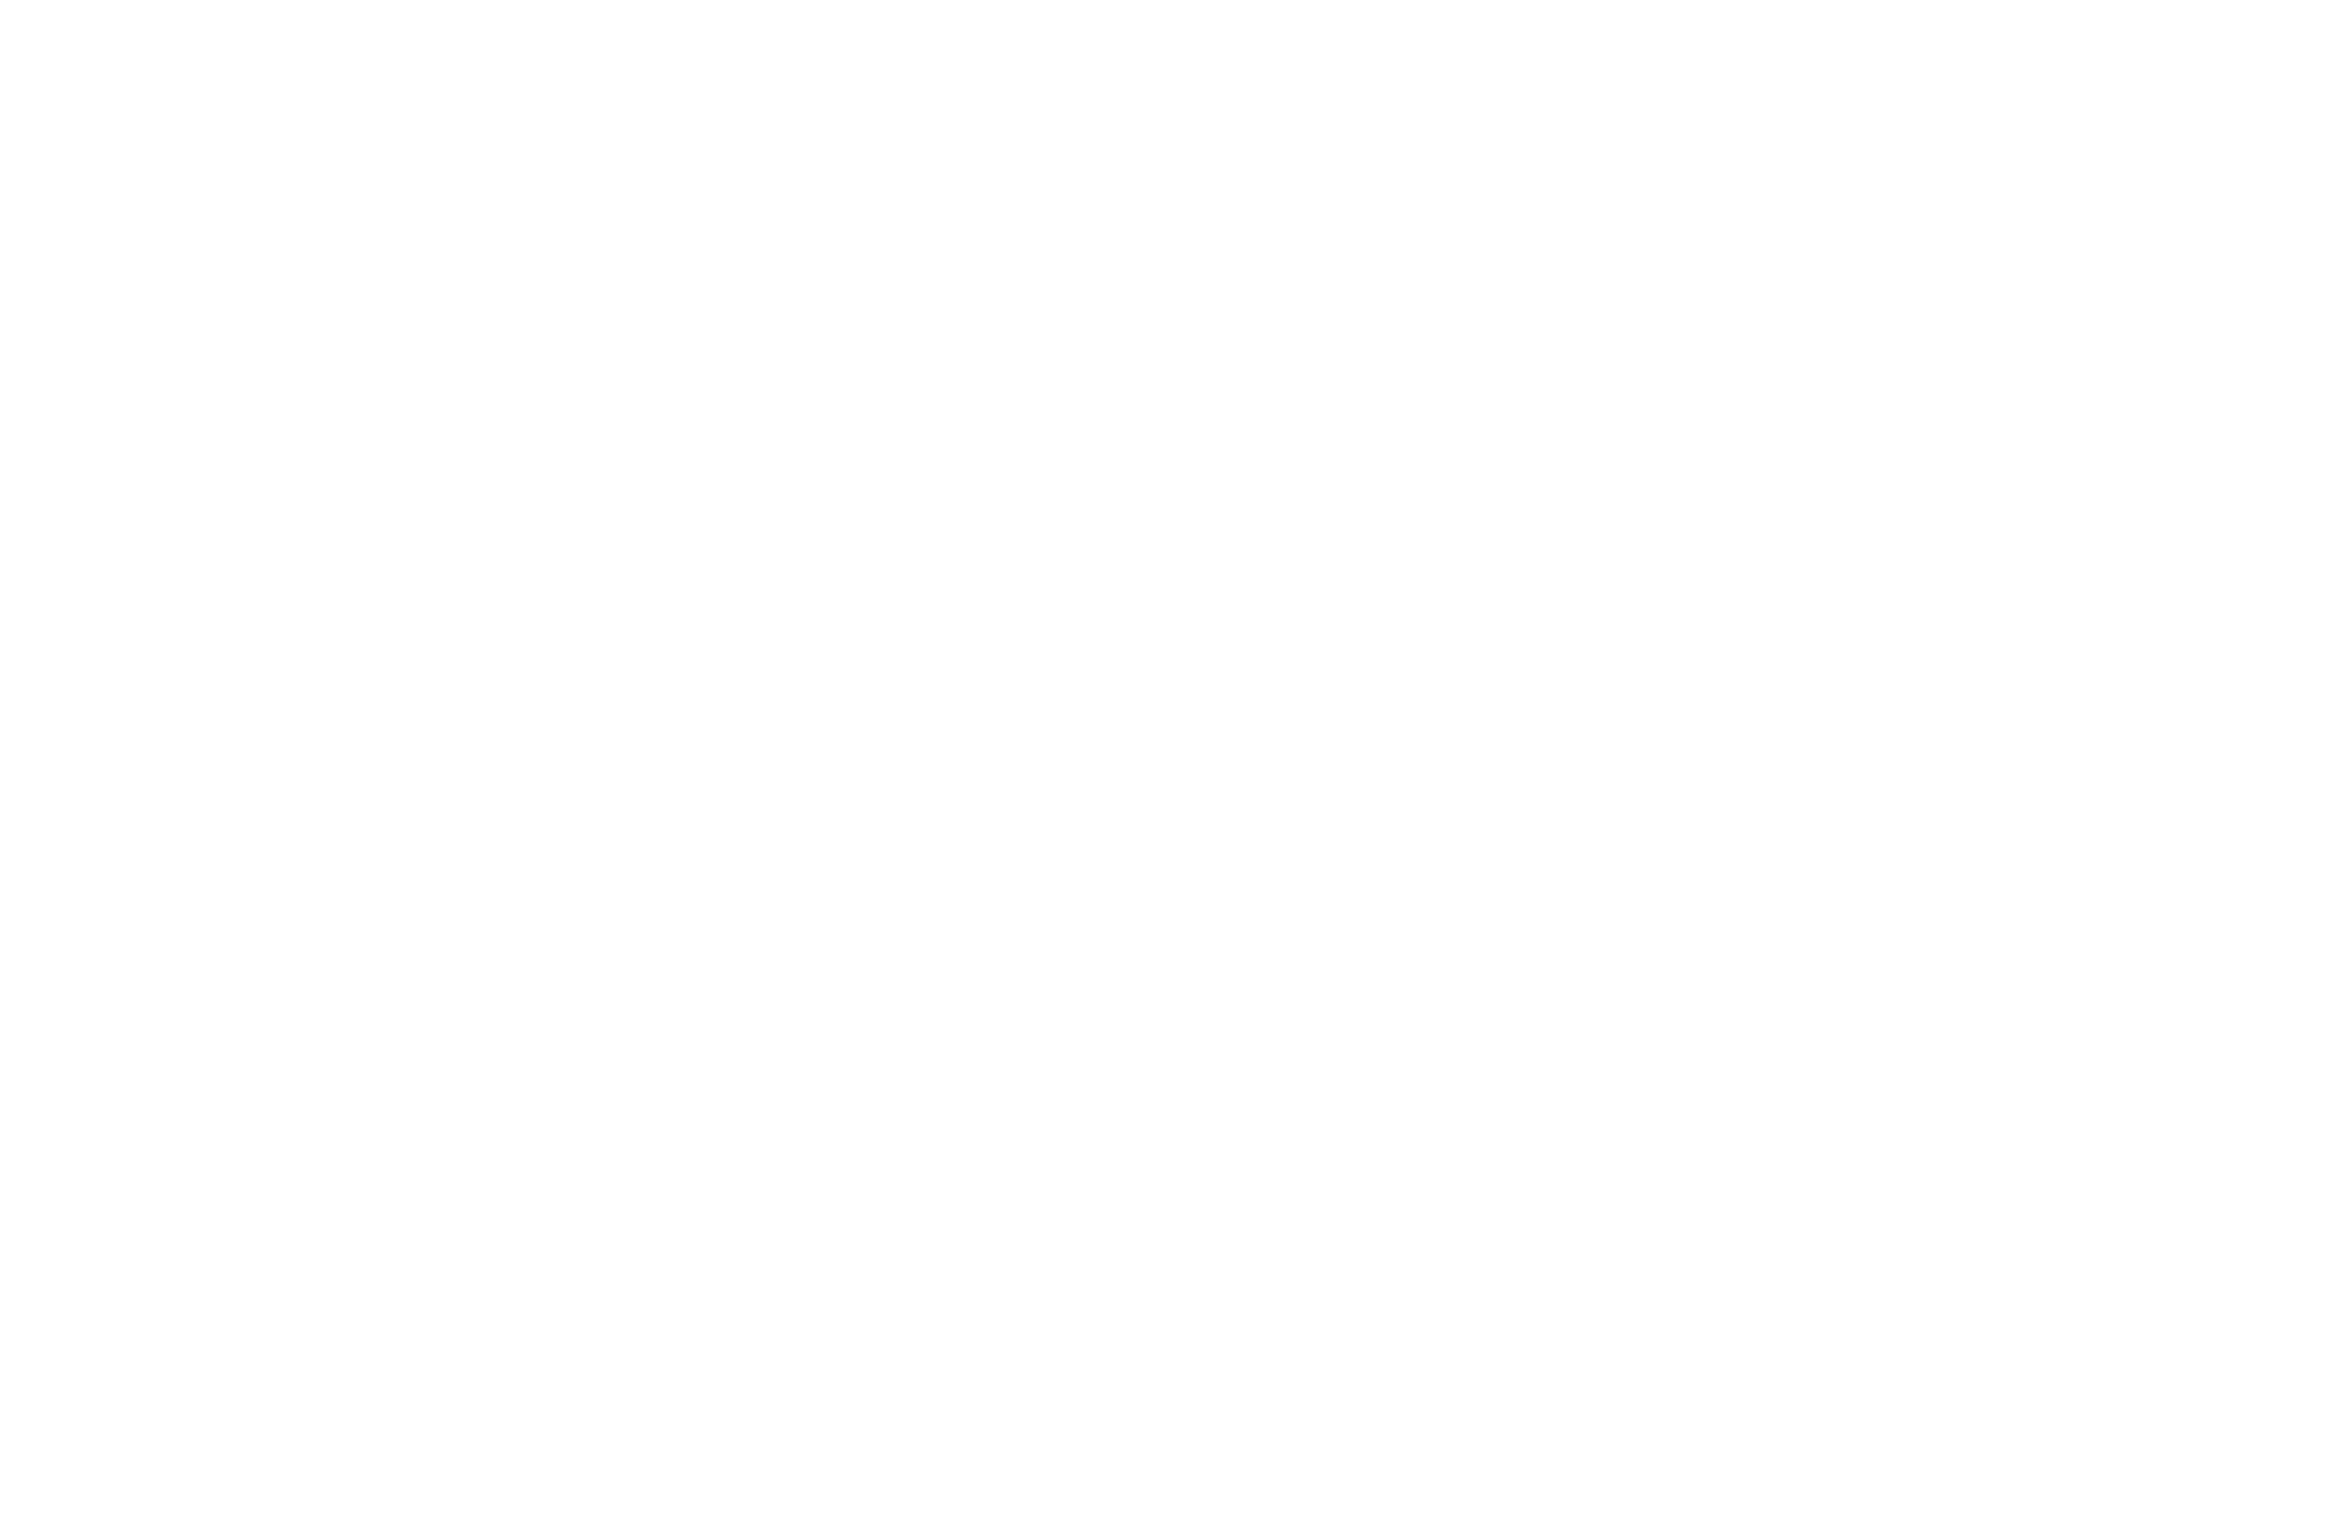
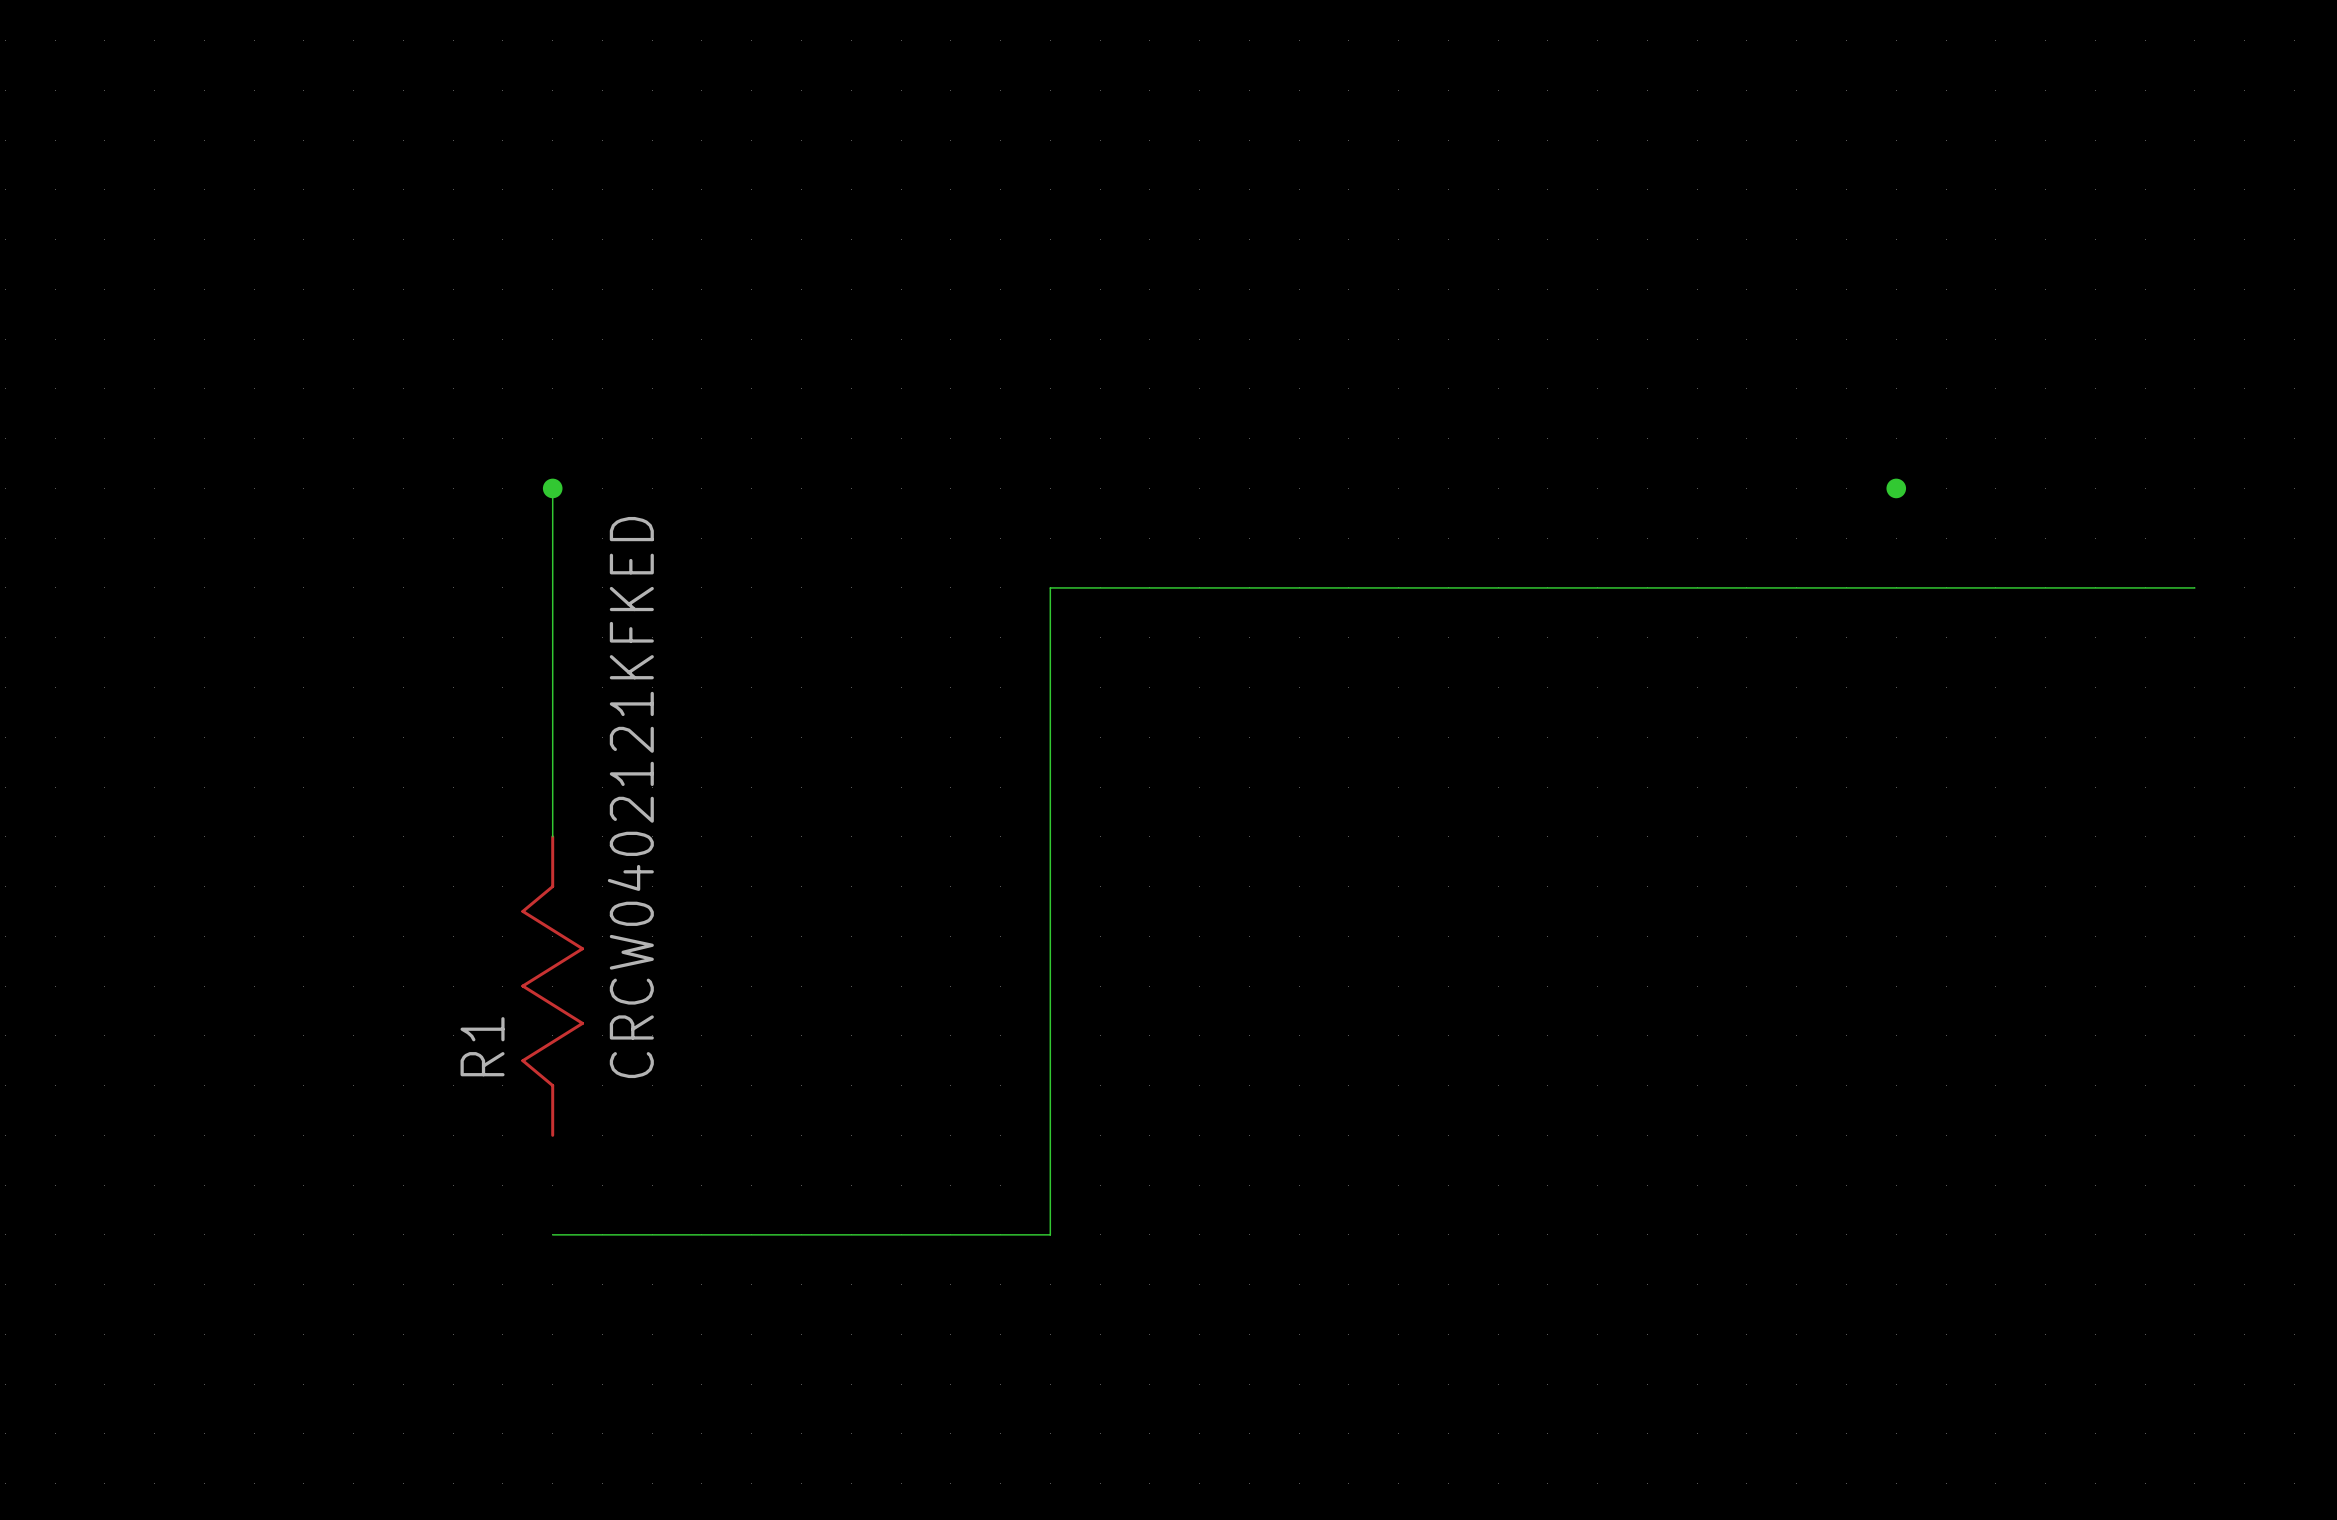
wire: none -> (552, 488) (552, 836)
junction: none -> (552, 488)
junction: none -> (1896, 488)
wire: none -> (2194, 587) (1050, 587) (1050, 1234) (552, 1234)
R1: none -> CRCW0402121KFKED (552, 986)

